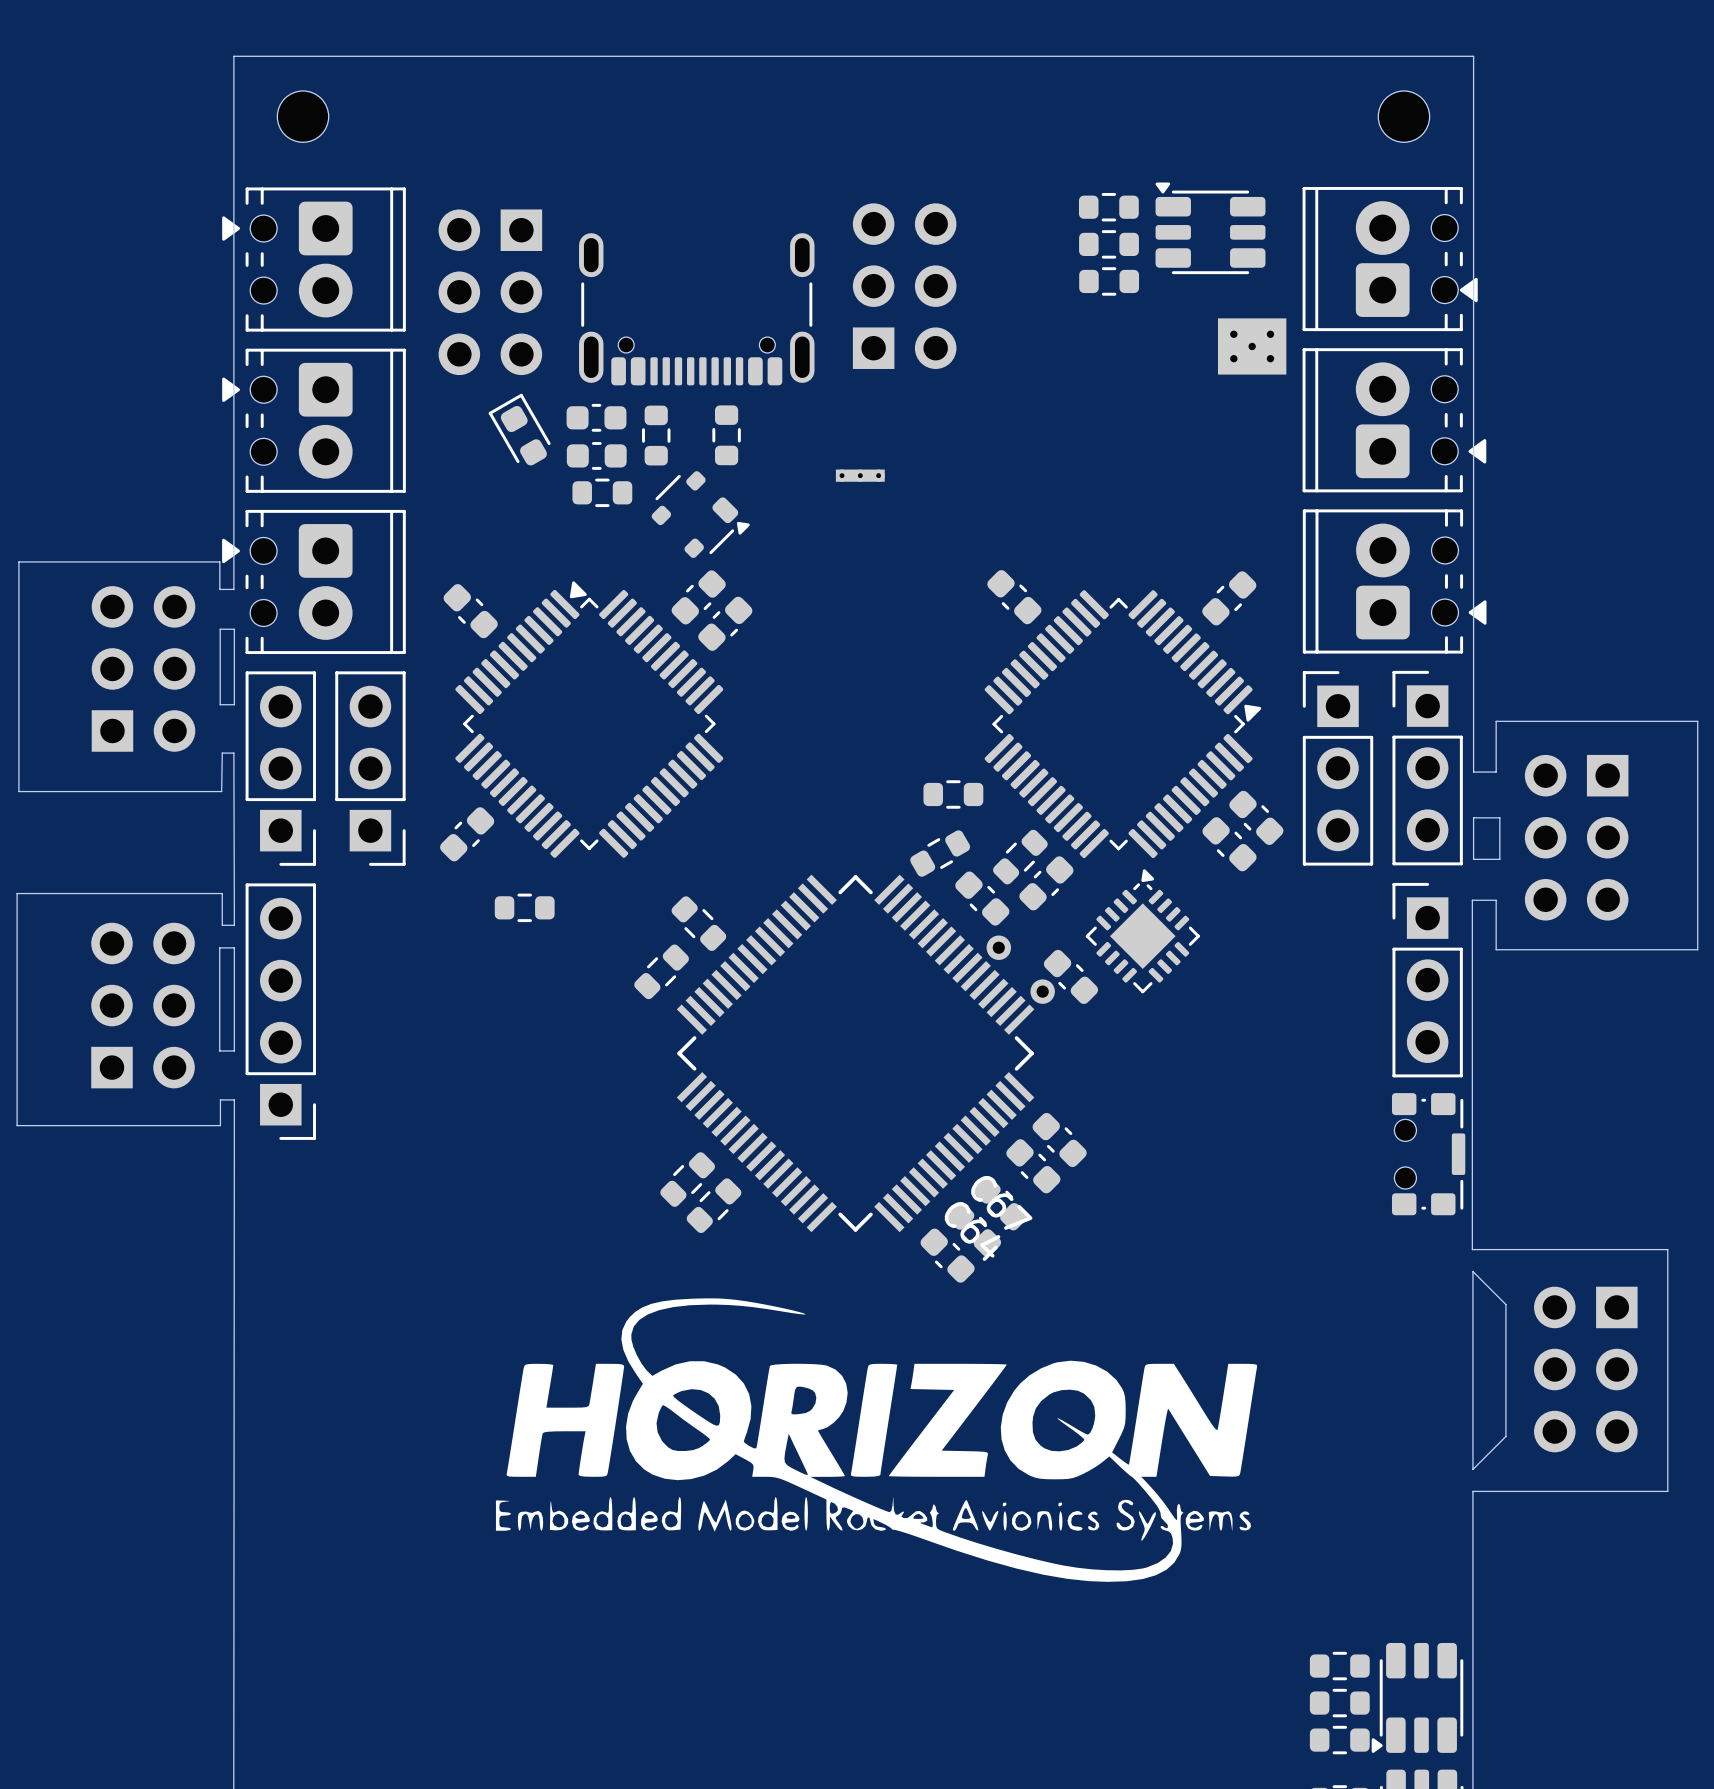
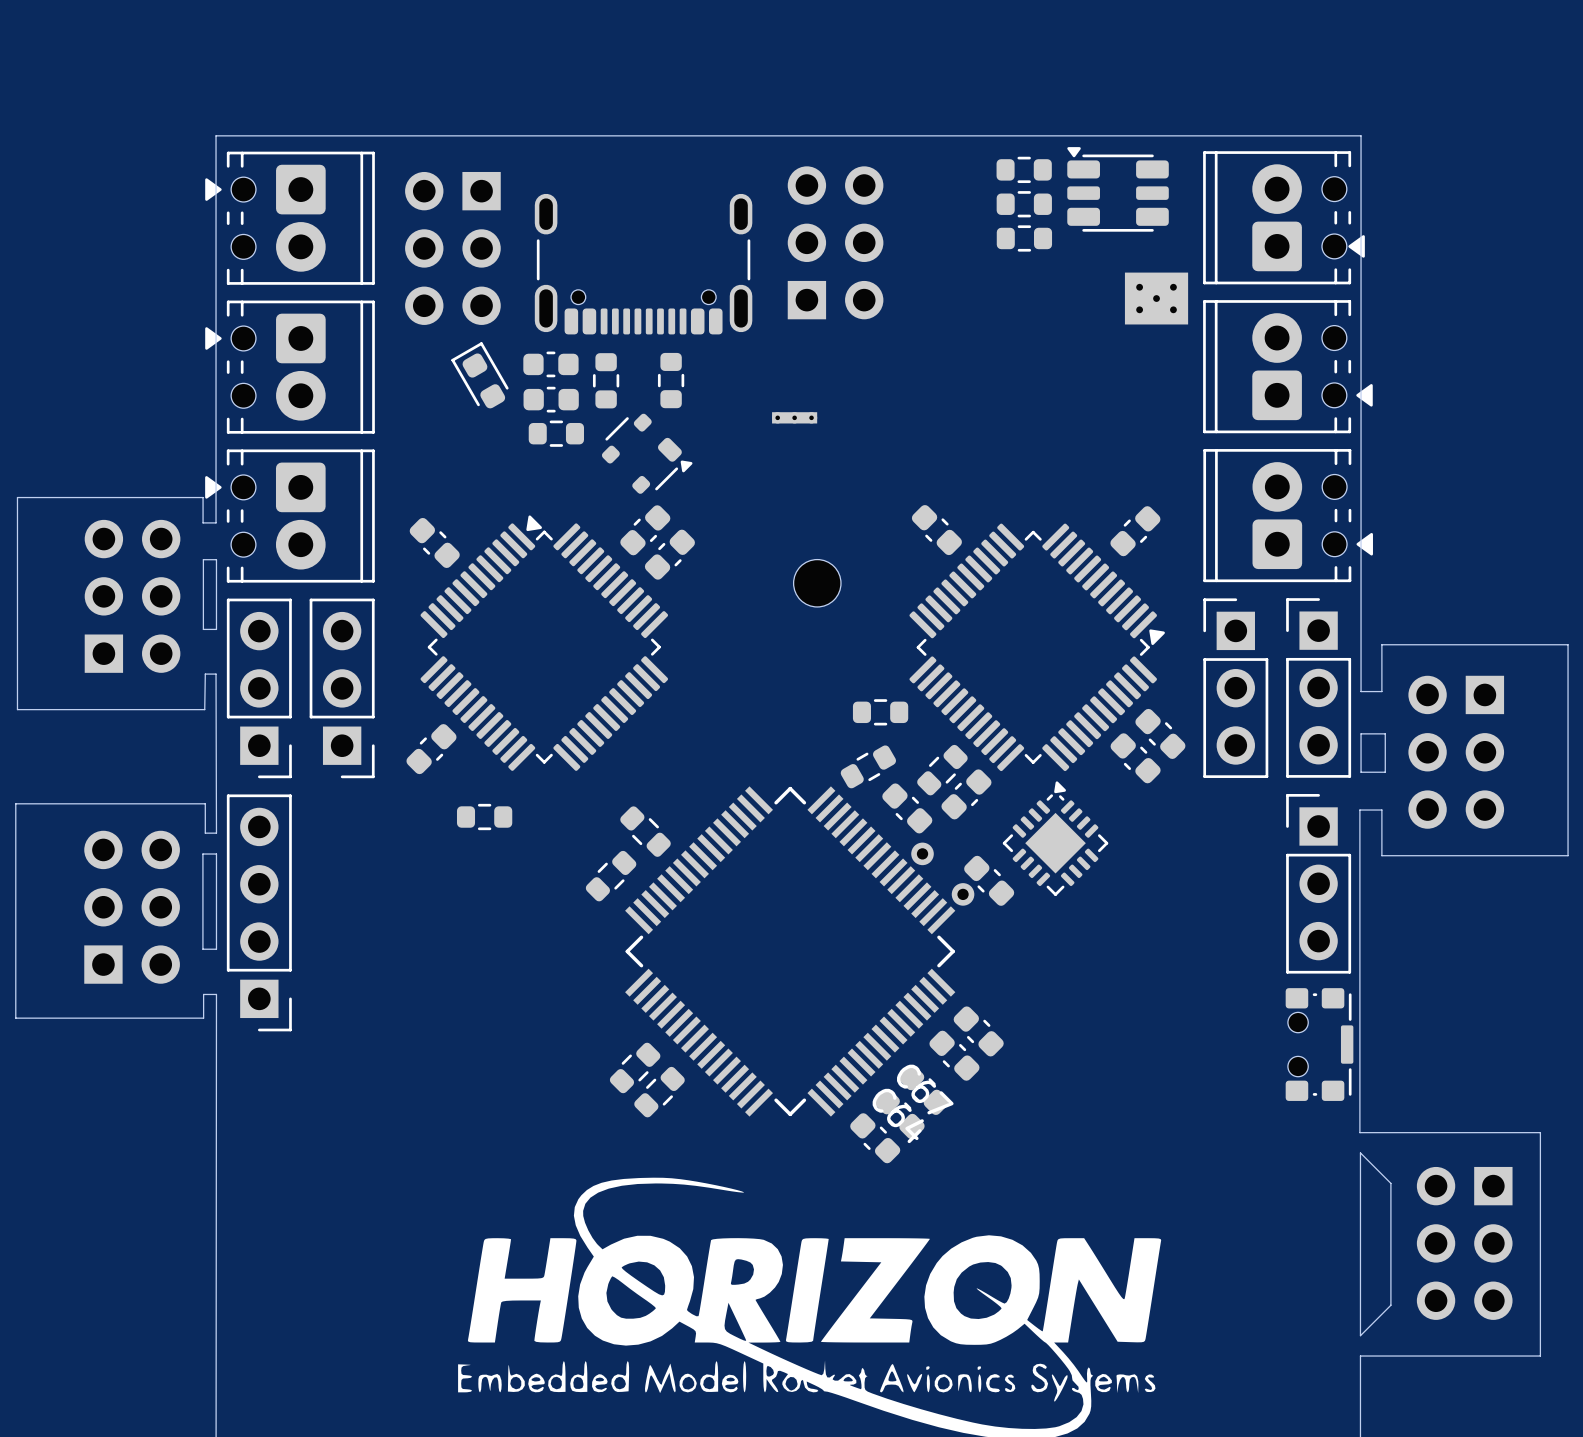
part: (303, 116) -> none
part: (1403, 116) -> none
board edge: (1473, 170) (1473, 56) (233, 56) (233, 170) -> (1361, 135) (216, 135)
part: none -> (817, 583)

